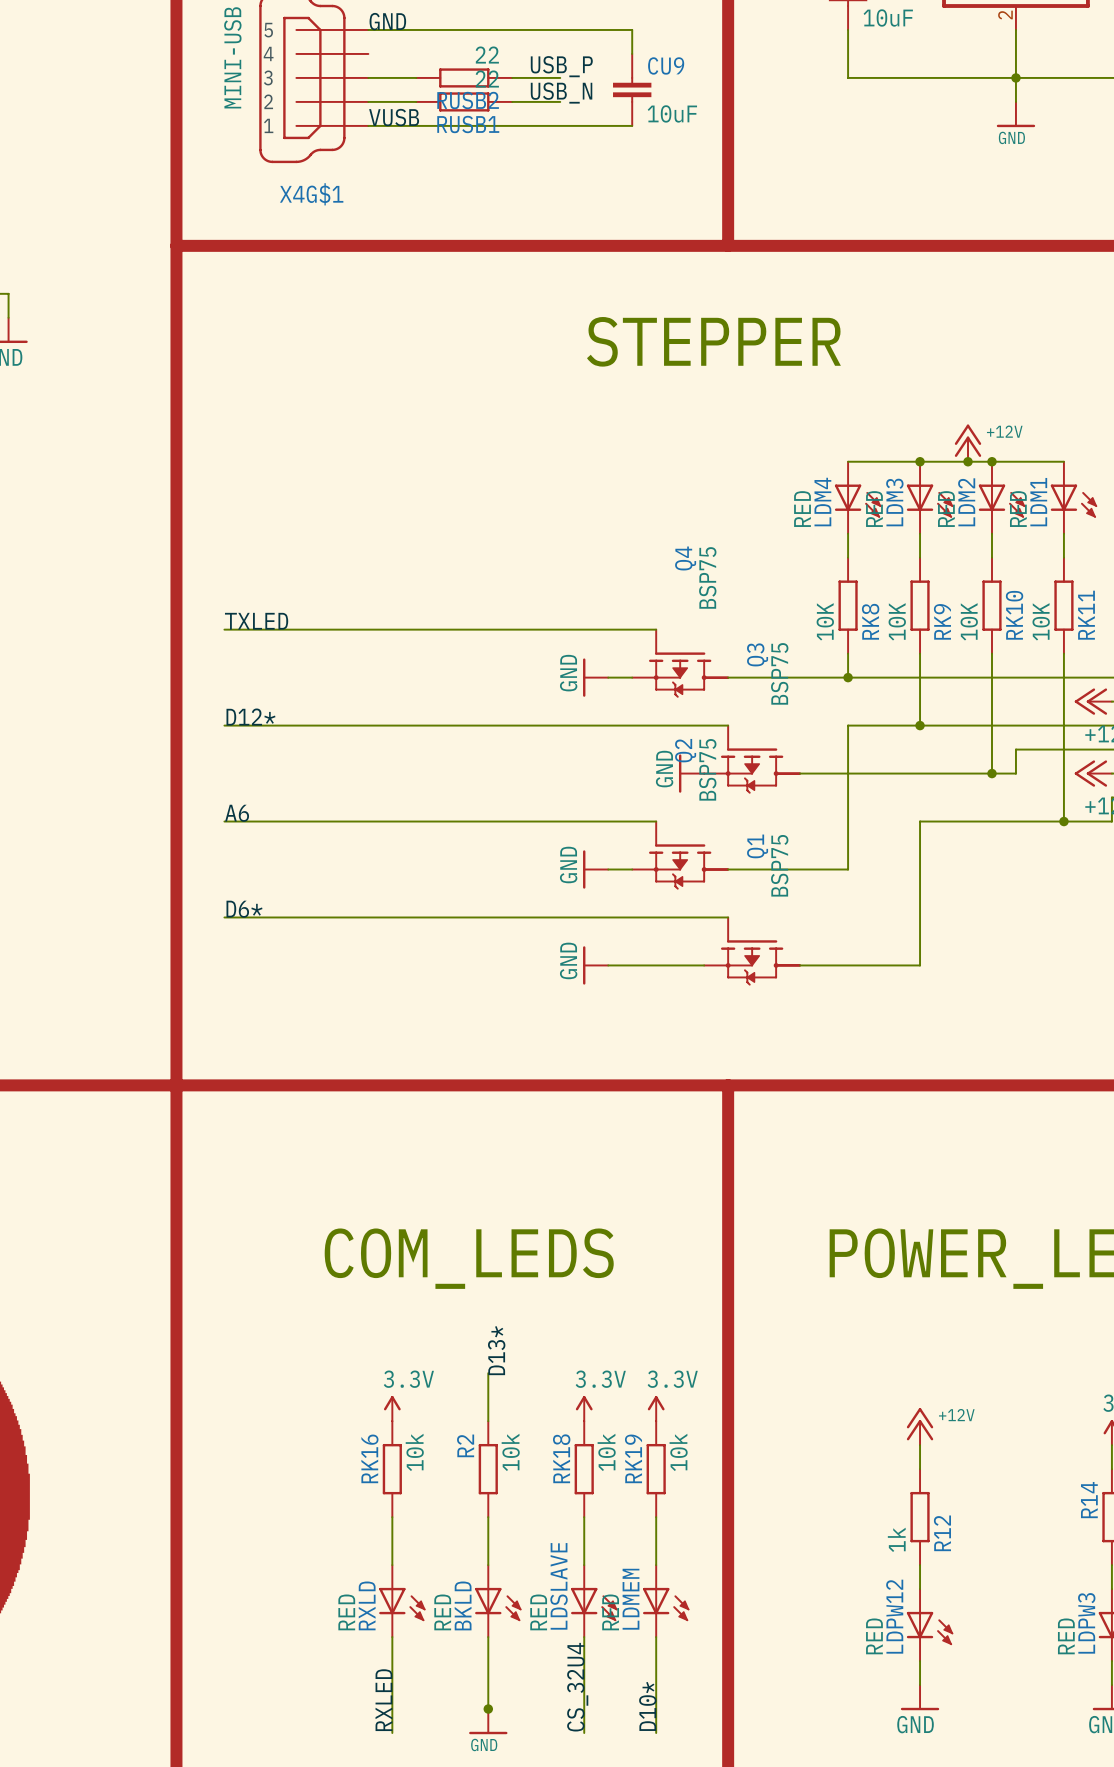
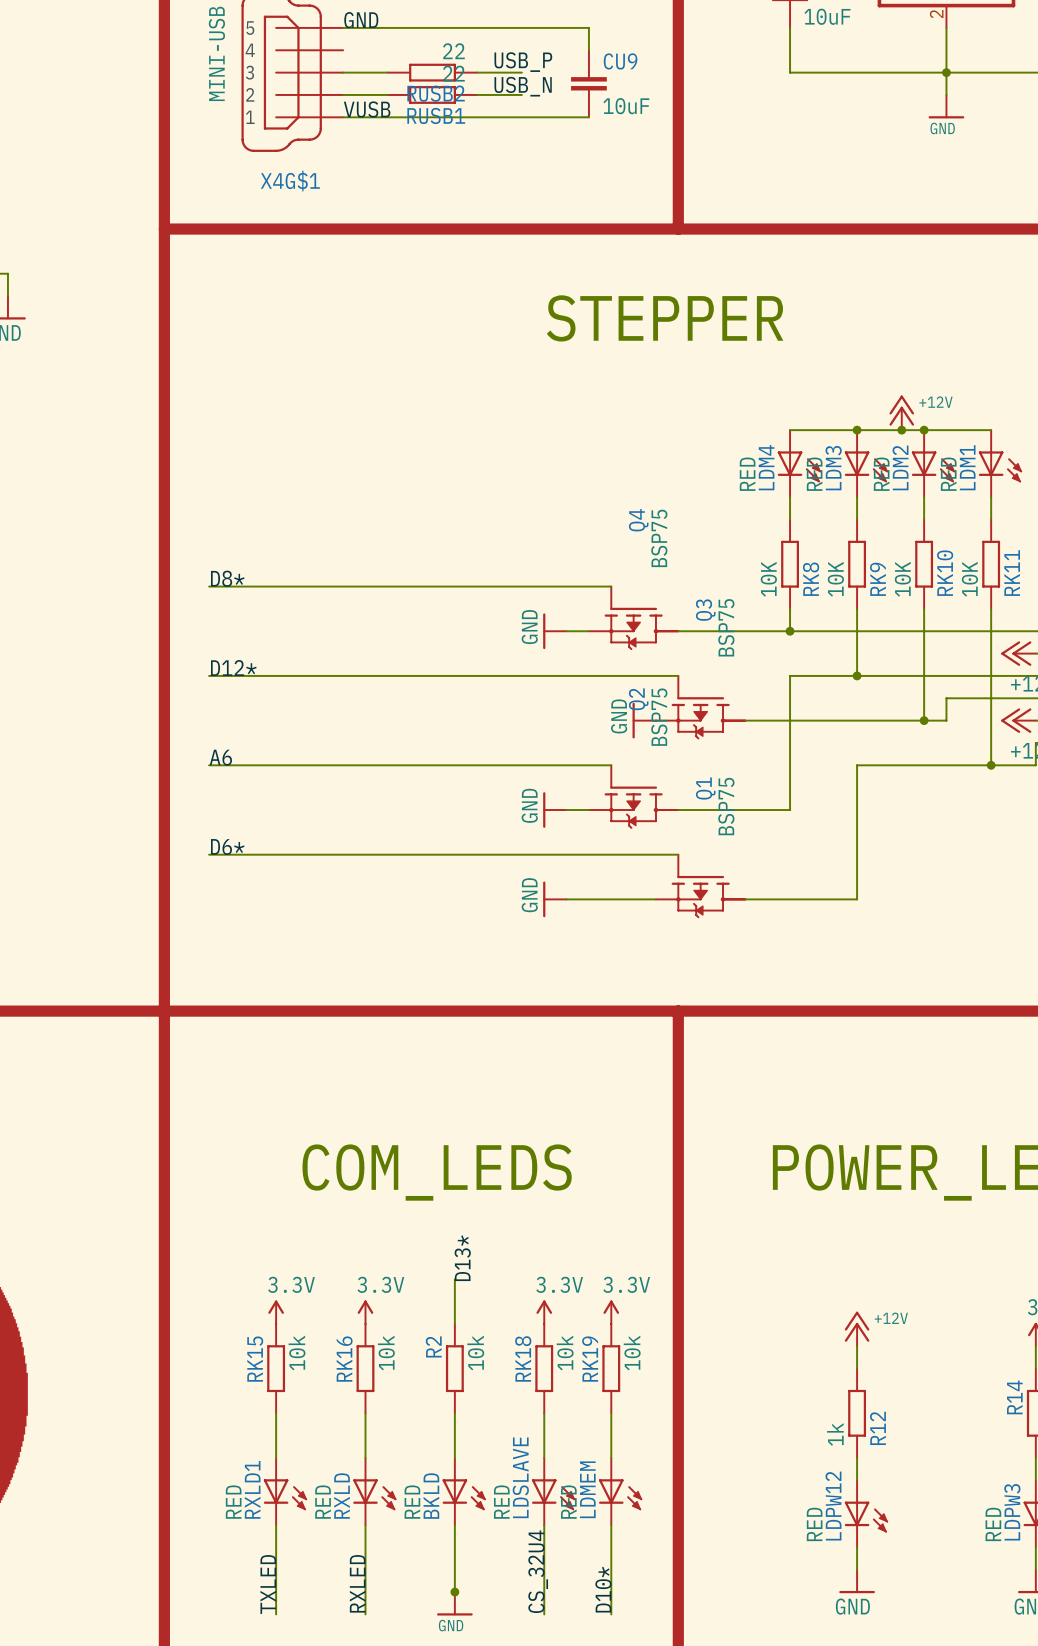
label: TXLED (256, 621) -> D8* (227, 578)
power symbol: none -> 3.3V (276, 1312)
RK15: none -> 10k (276, 1368)
wire: none -> (276, 1413) (276, 1458)
RXLD1: none -> RED (285, 1491)
wire: none -> (276, 1525) (276, 1614)
label: none -> TXLED (268, 1584)

